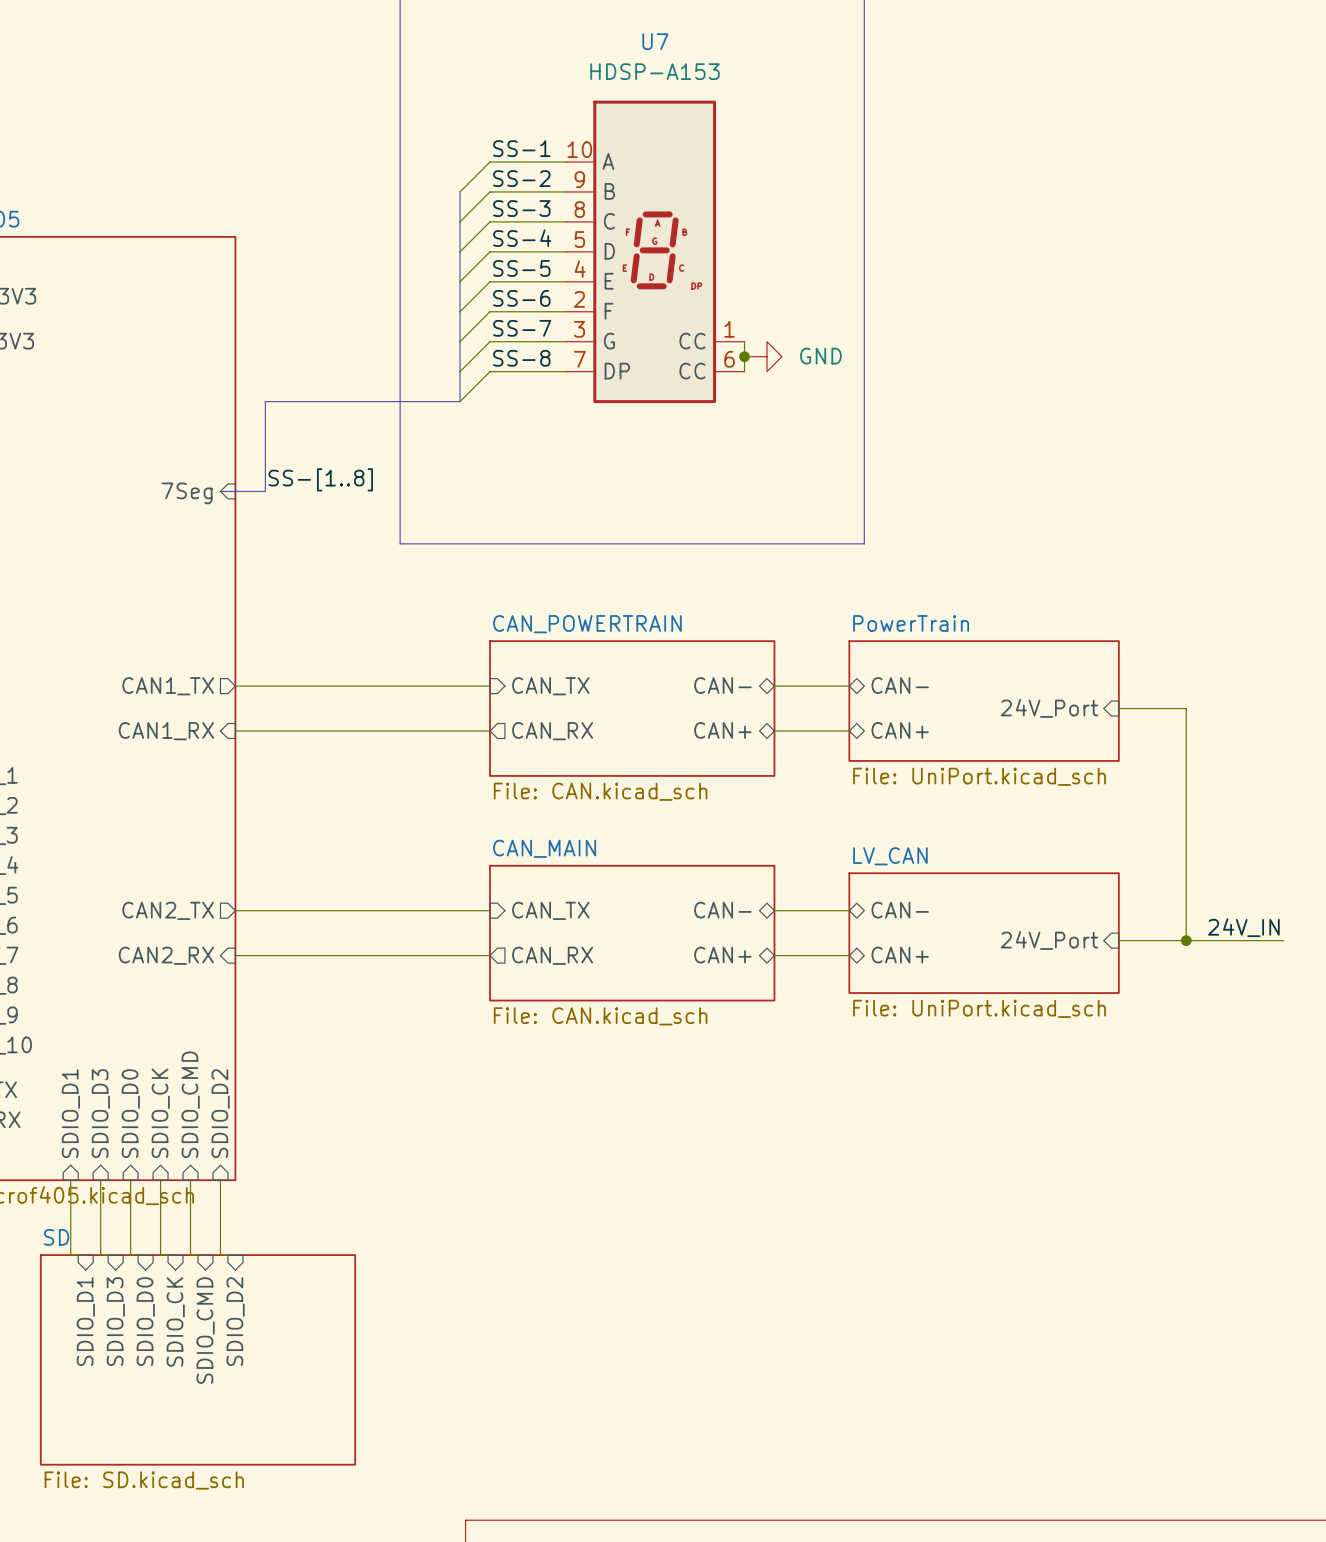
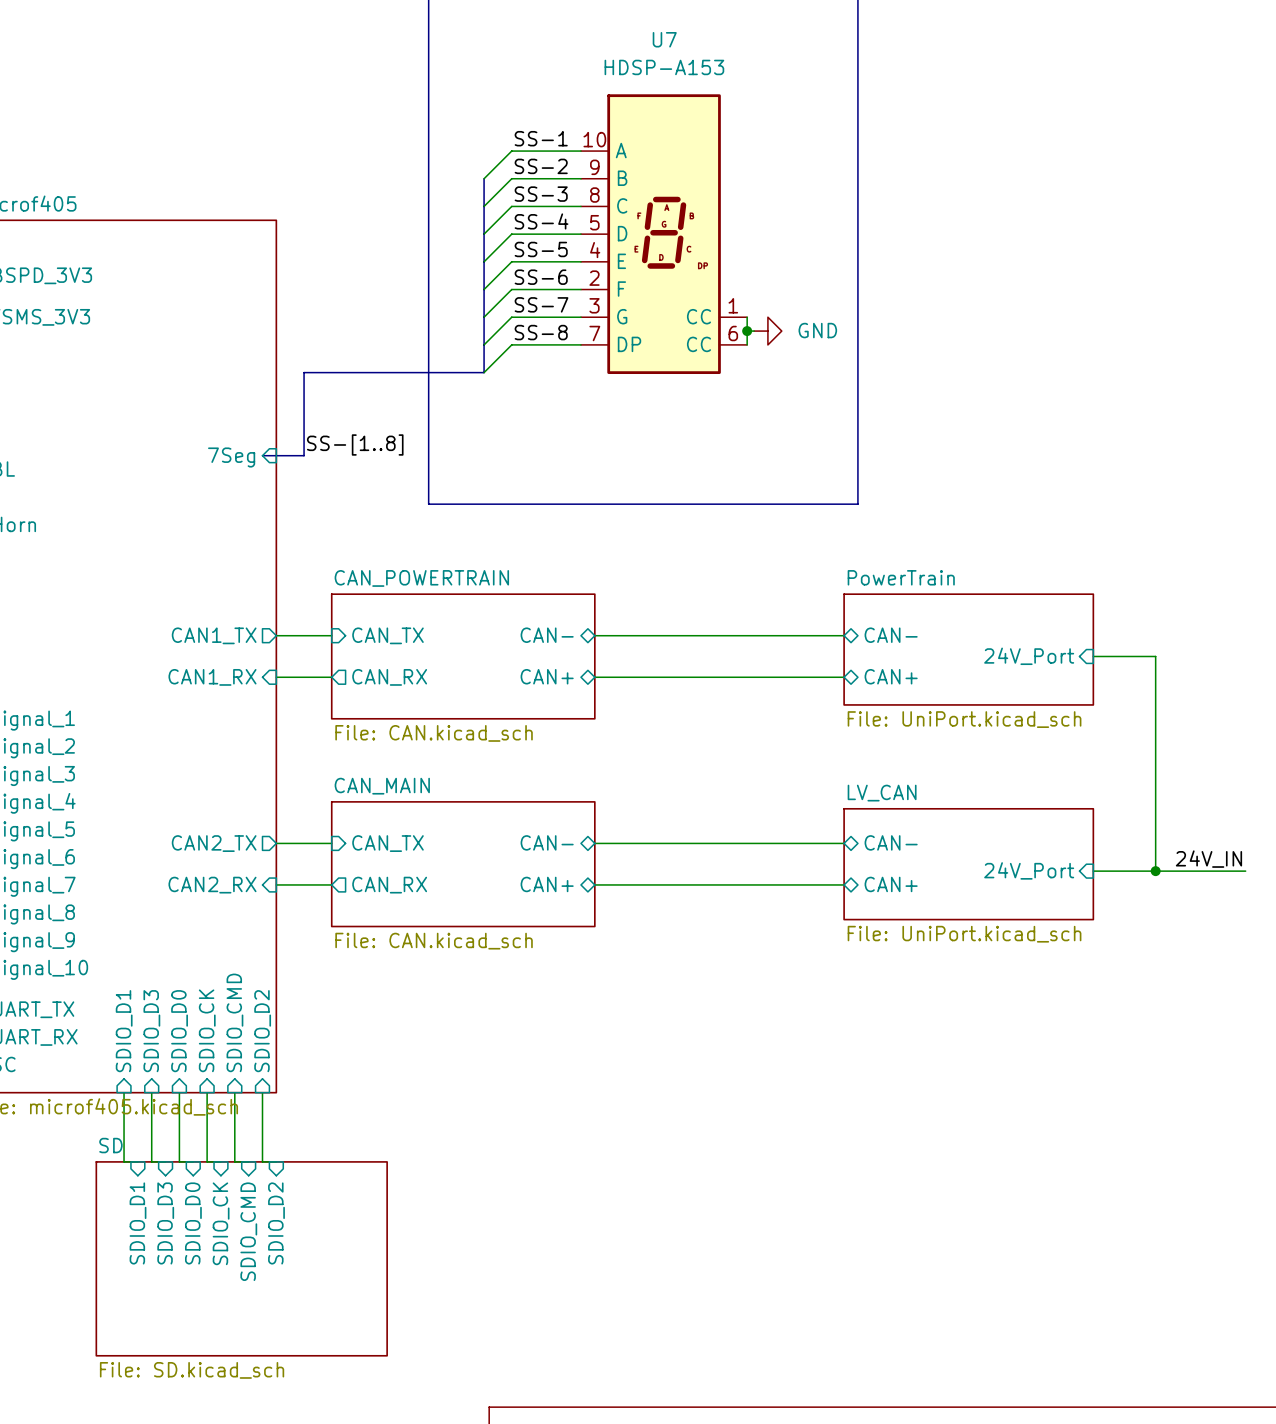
sheet pin: none -> CAN- (547, 635)
sheet pin: CAN- (722, 685) -> none
wire: (295, 686) (489, 686) -> (594, 635) (774, 635)
sheet pin: none -> CAN_TX (388, 635)
sheet pin: CAN_TX (550, 686) -> none
sheet CAN_POWERTRAIN position: (632, 708) -> (463, 656)
sheet pin: none -> CAN+ (547, 676)
sheet pin: CAN+ (722, 730) -> none
wire: (295, 731) (489, 731) -> (594, 677) (774, 677)
sheet pin: none -> CAN_RX (389, 677)
sheet pin: CAN_RX (552, 731) -> none
wire: (295, 910) (489, 910) -> (594, 843) (774, 843)
sheet pin: none -> CAN_TX (388, 843)
sheet pin: none -> CAN- (547, 842)
sheet pin: CAN_TX (550, 910) -> none
sheet pin: CAN- (722, 910) -> none
sheet CAN_MAIN position: (632, 933) -> (463, 864)
wire: (295, 955) (489, 955) -> (594, 884) (774, 884)
sheet pin: none -> CAN_RX (389, 885)
sheet pin: none -> CAN+ (547, 884)
sheet pin: CAN_RX (552, 955) -> none
sheet pin: CAN+ (722, 955) -> none

